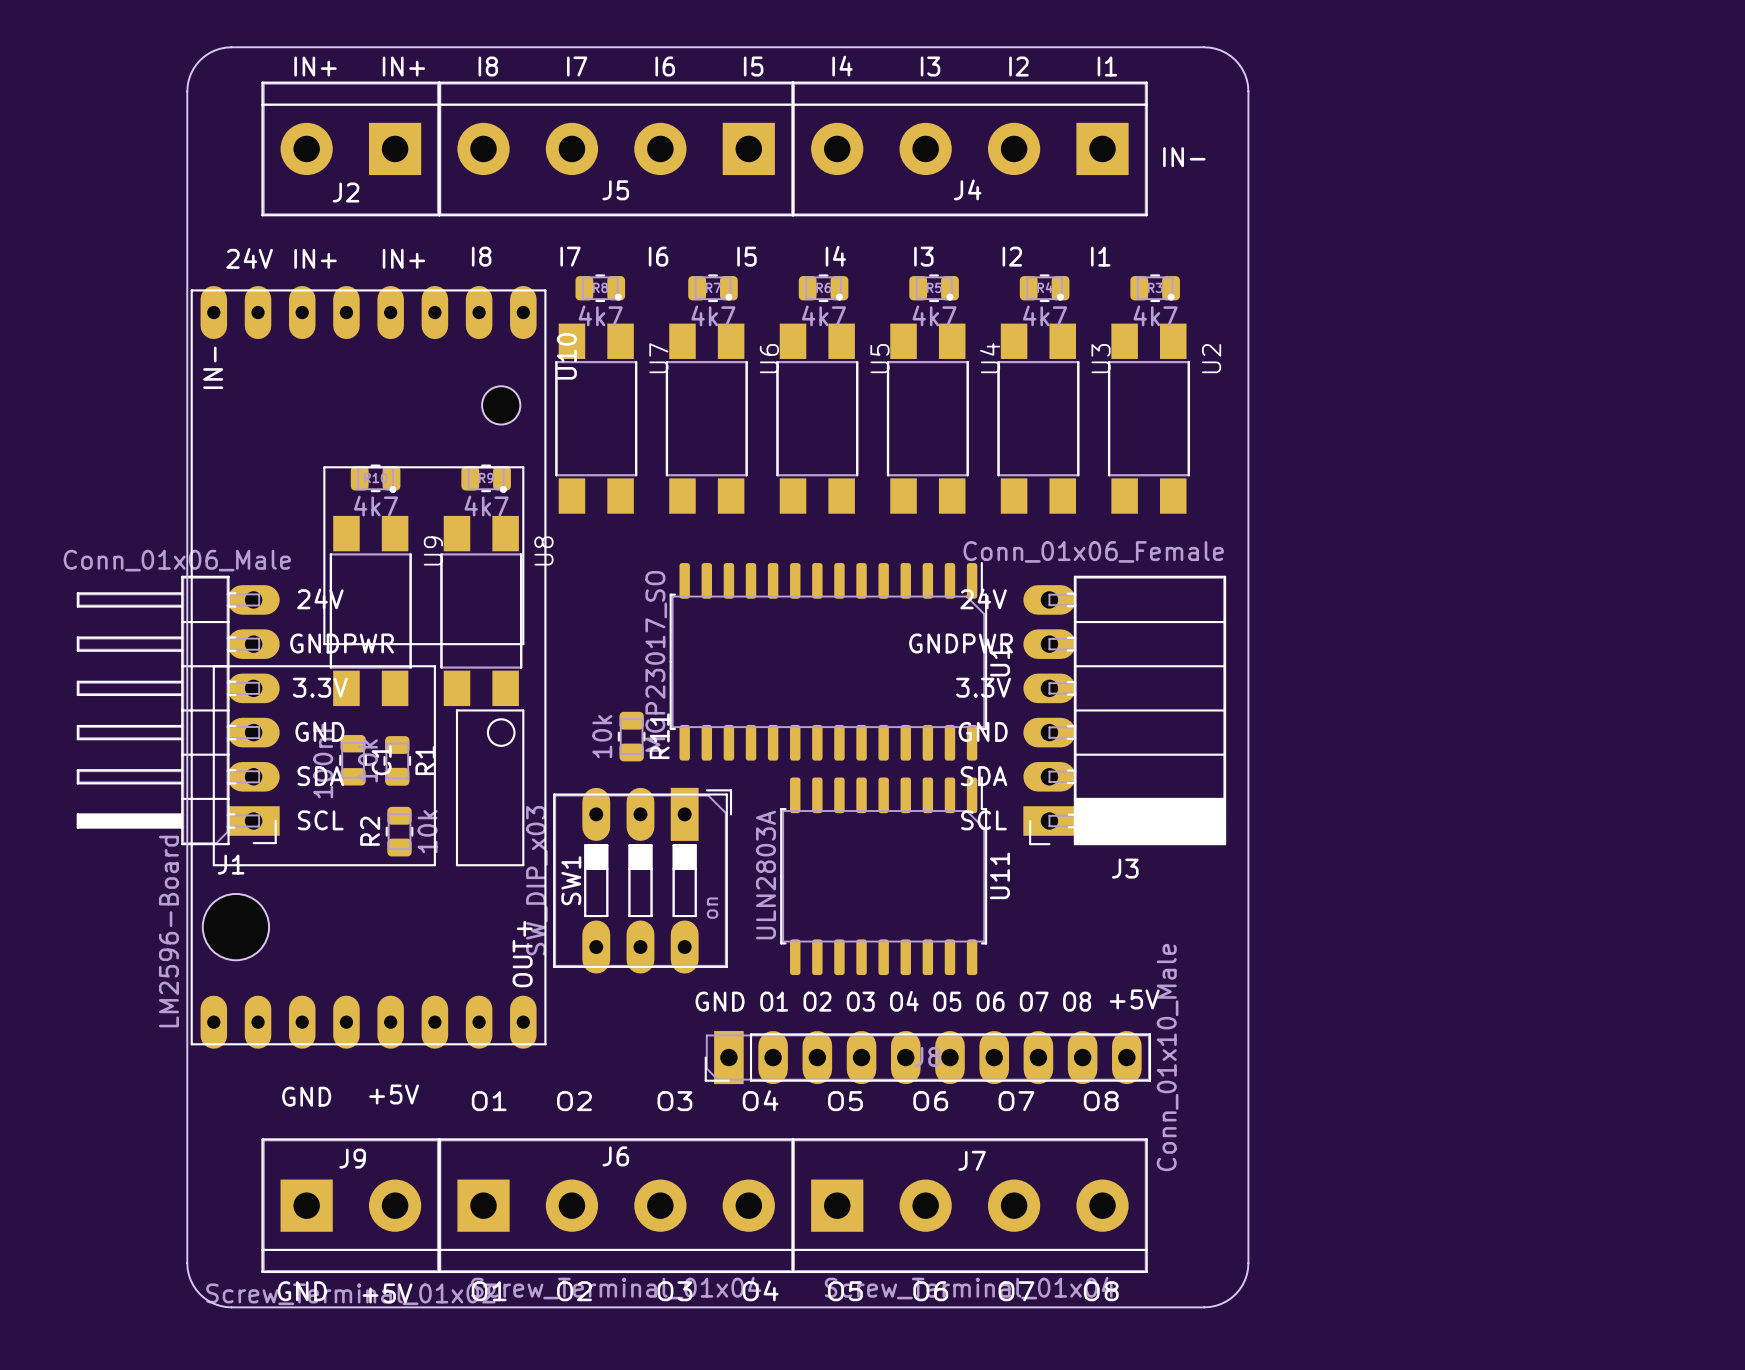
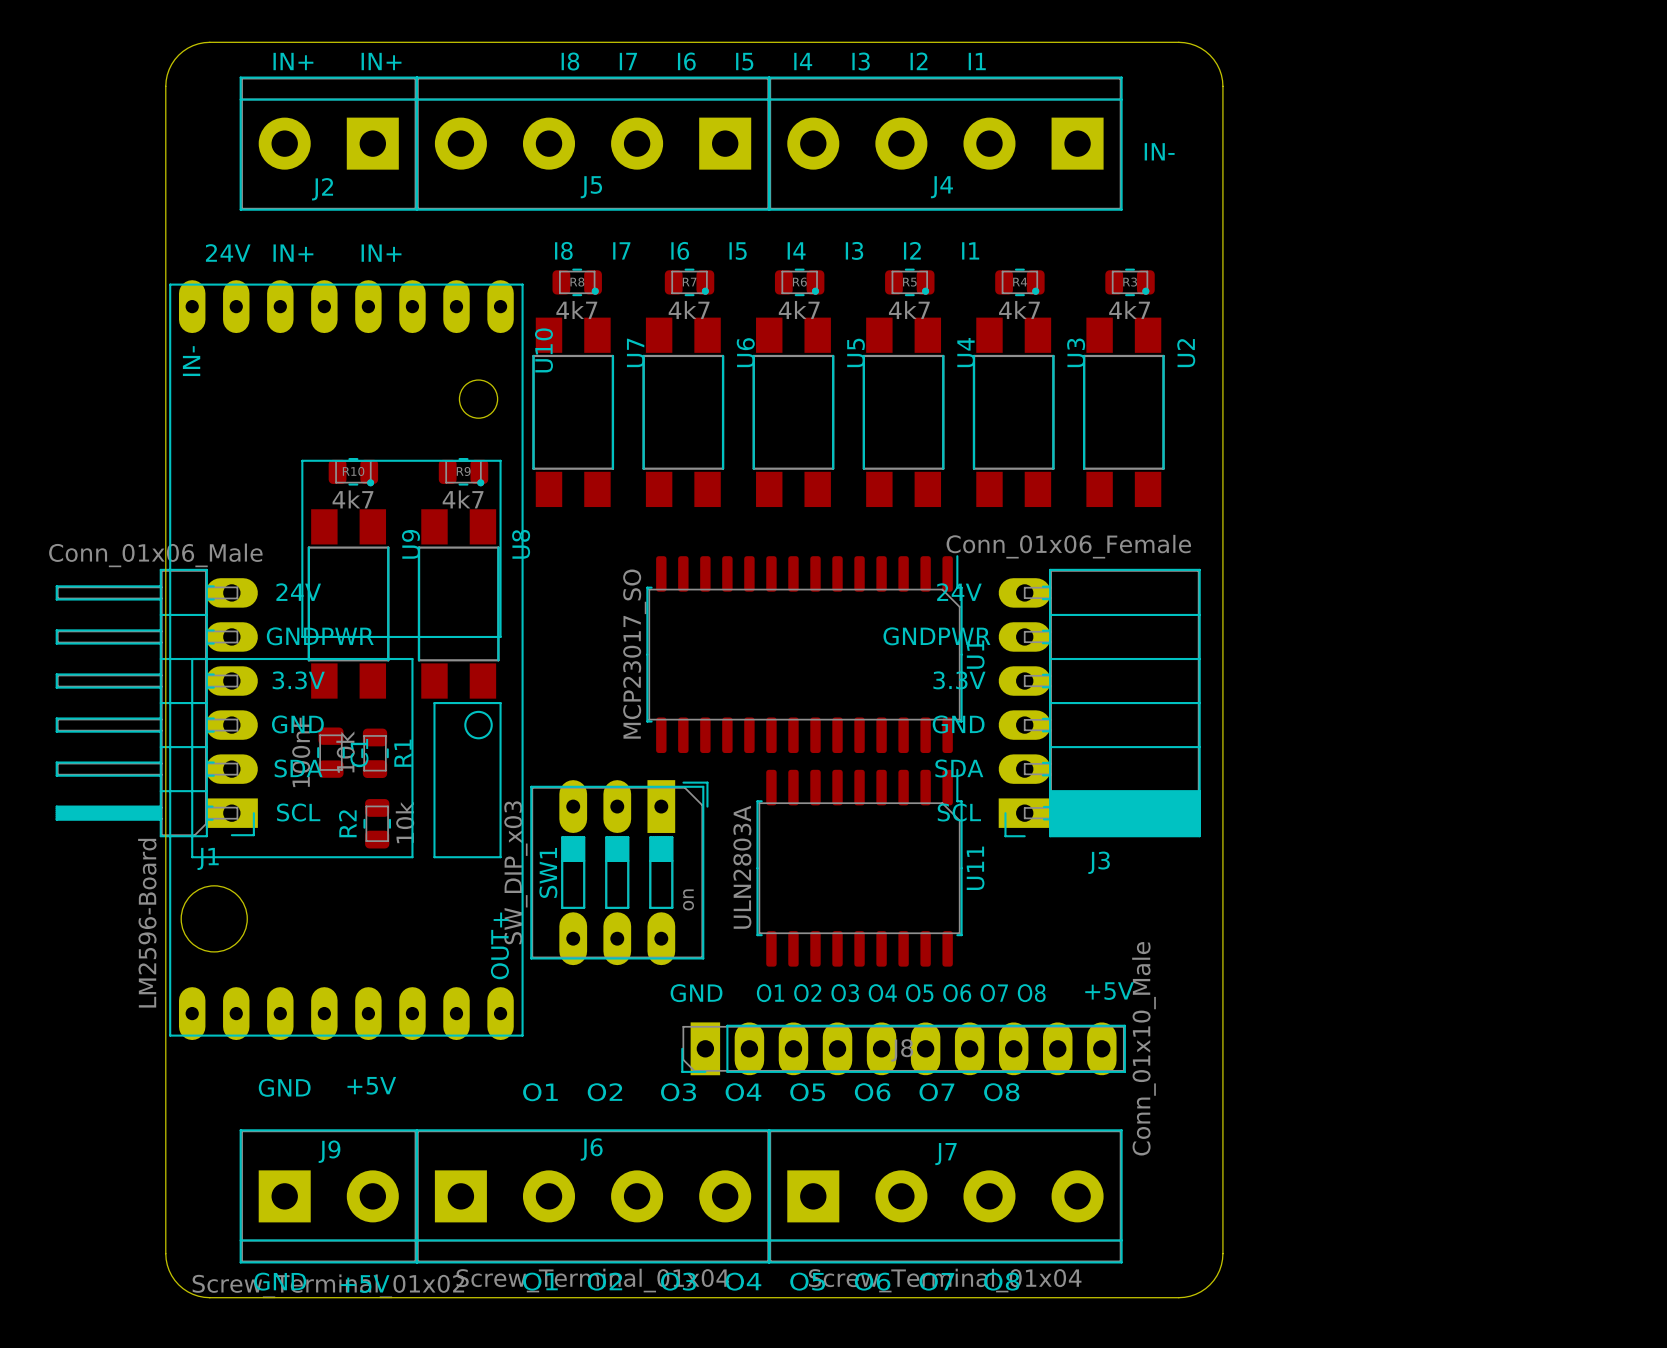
R11: 10k (631, 736) -> none

